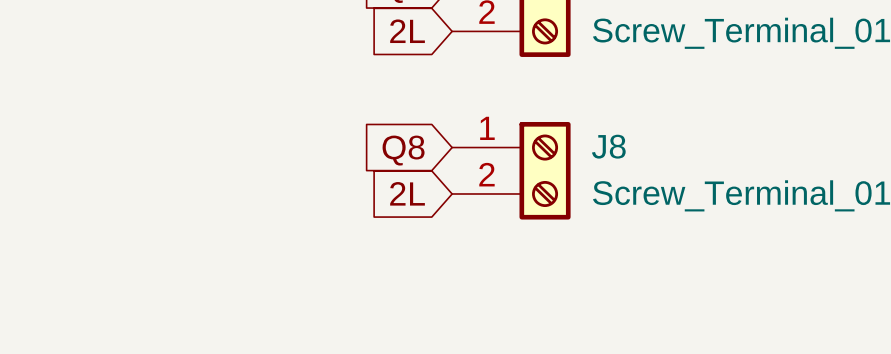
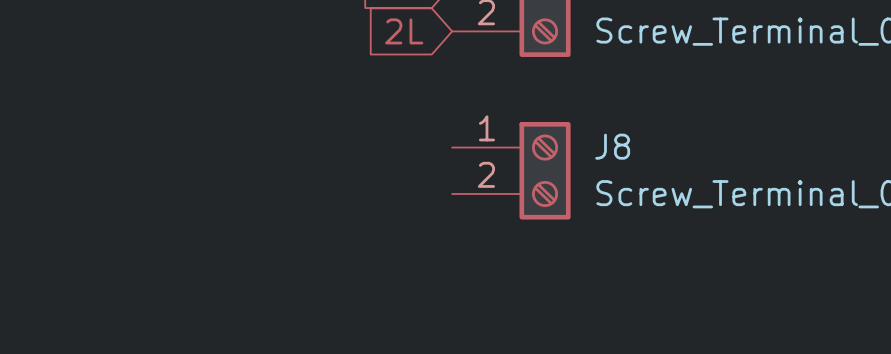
global label: Q8 (403, 150) -> none
global label: 2L (407, 193) -> none

